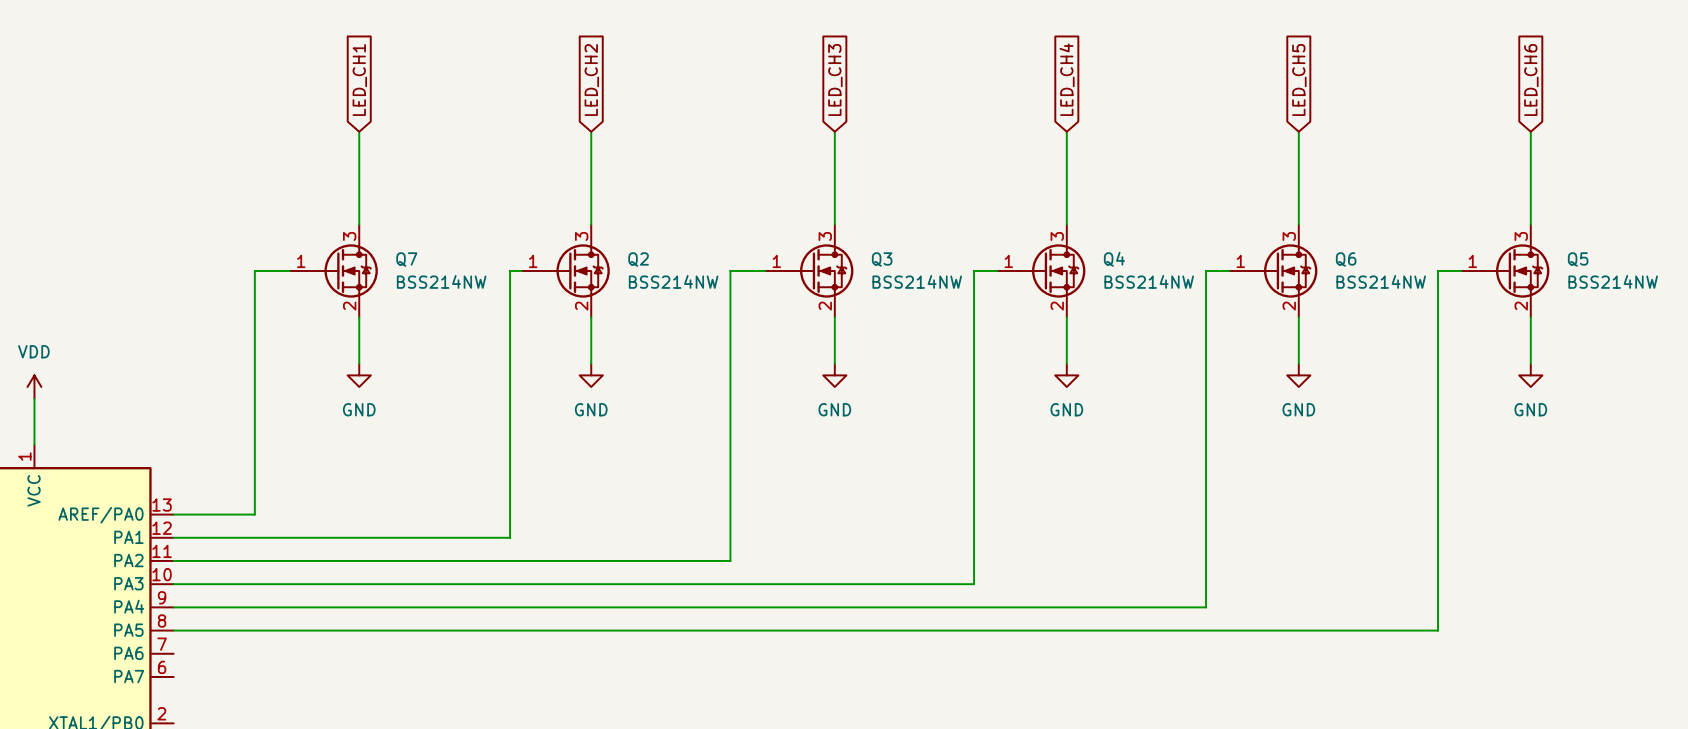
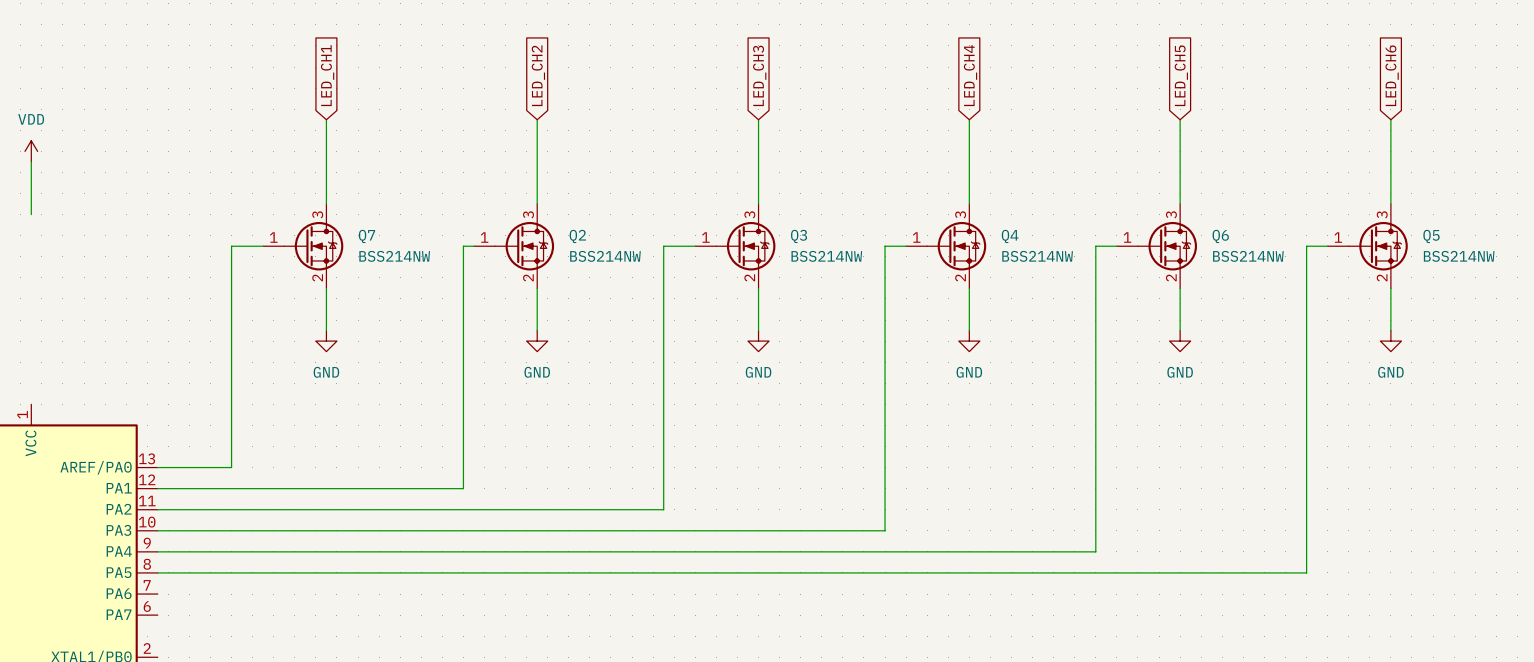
wire: none -> (31, 161) (31, 214)
power symbol position: VDD (34, 386) -> VDD (31, 151)
wire: (34, 398) (34, 444) -> none

